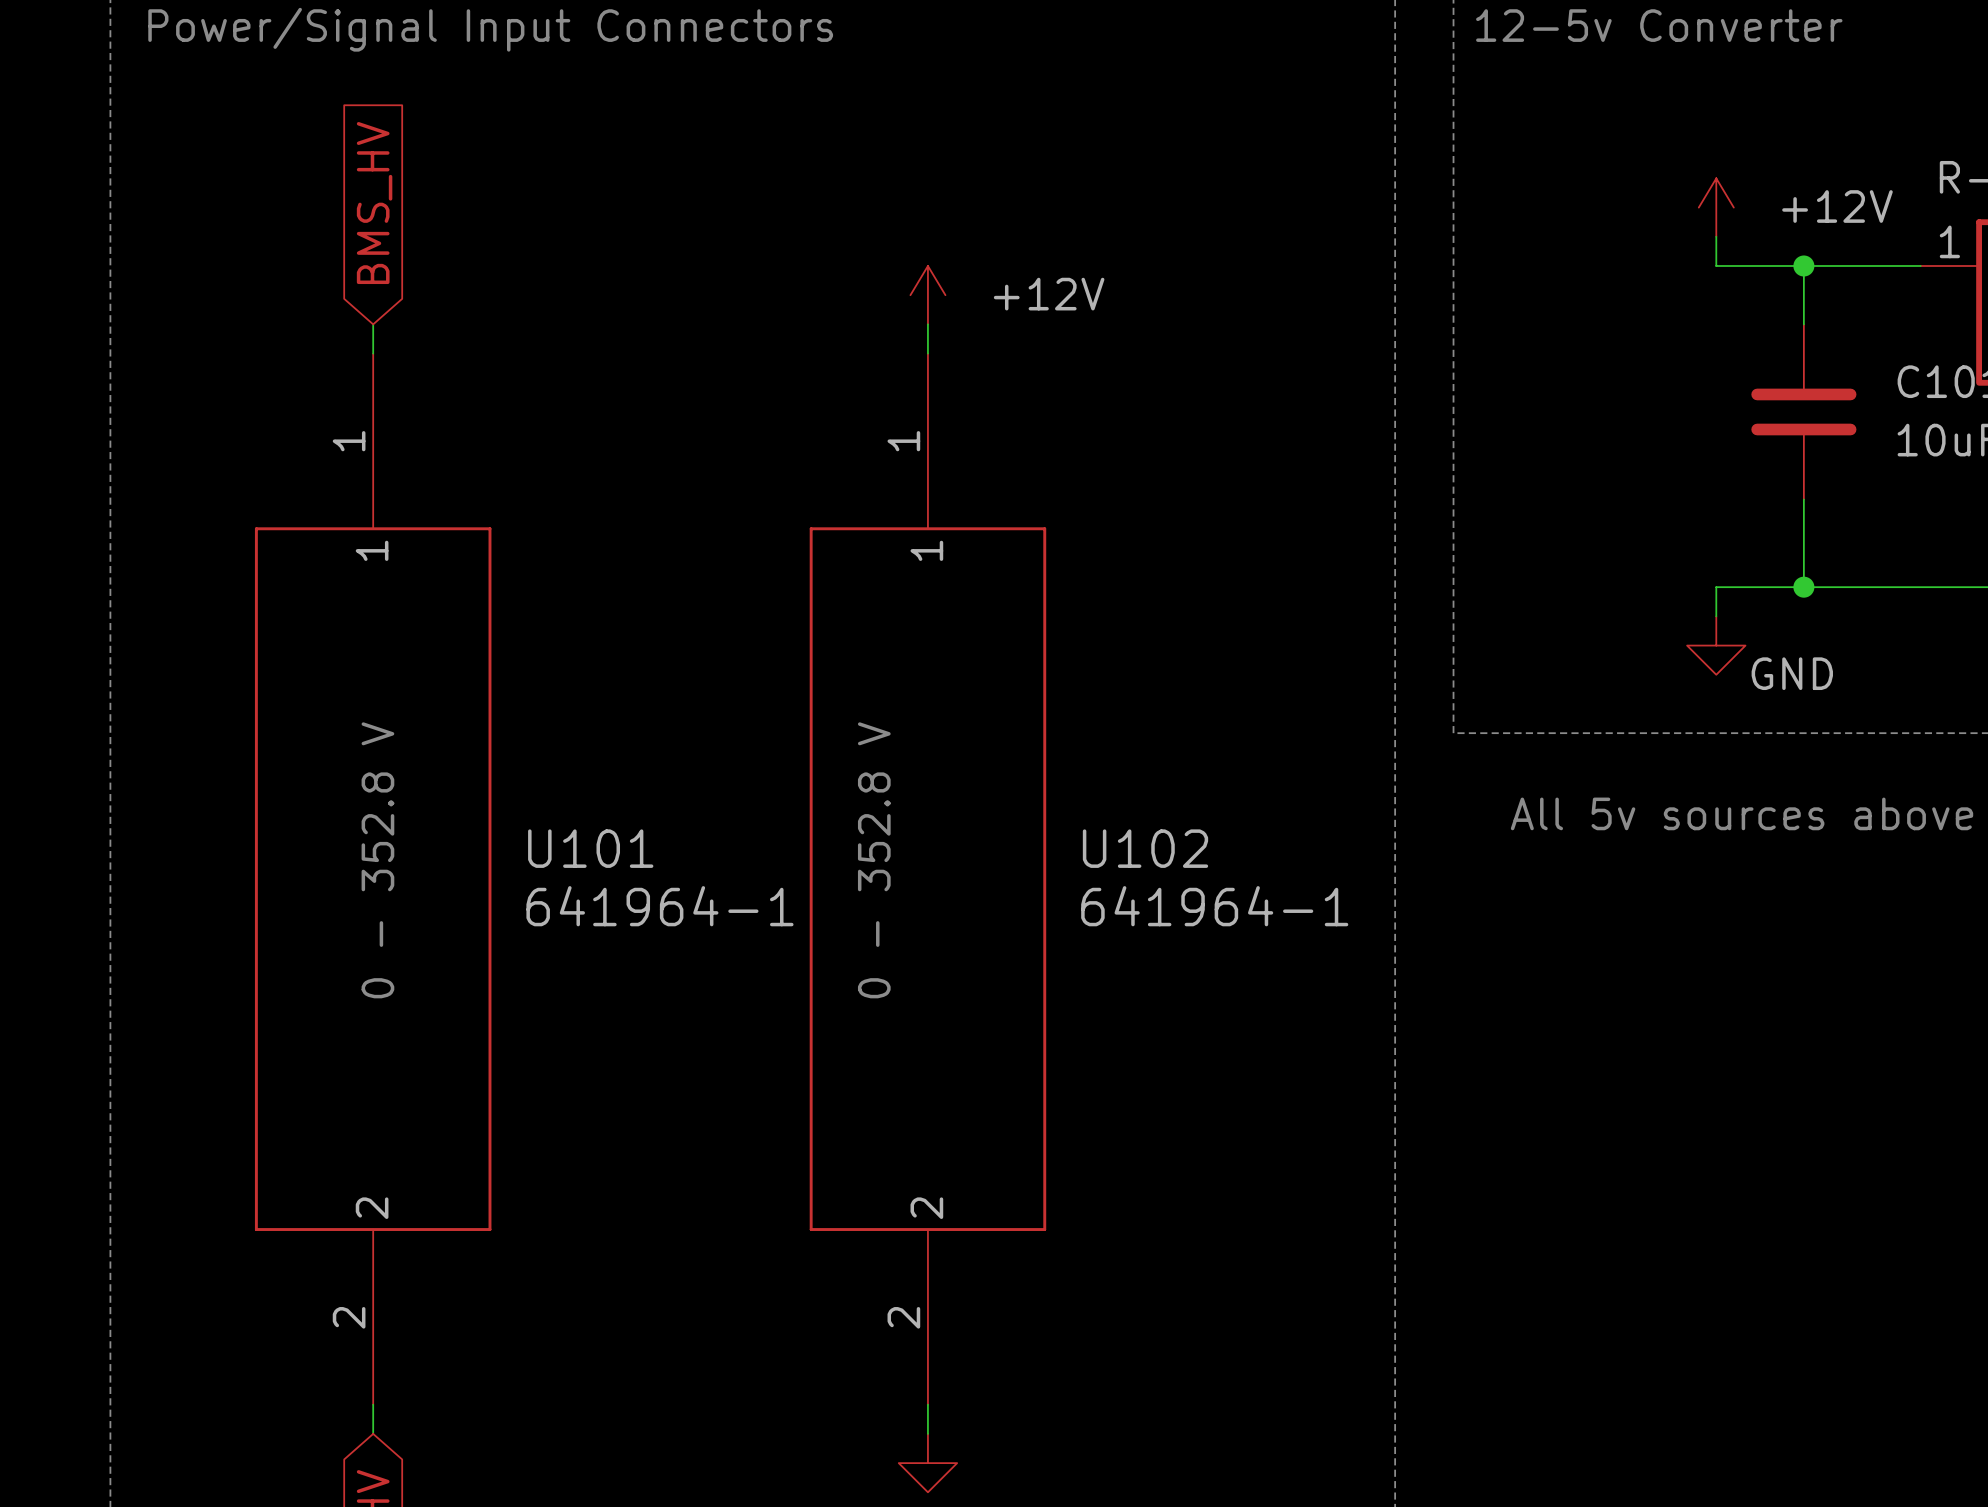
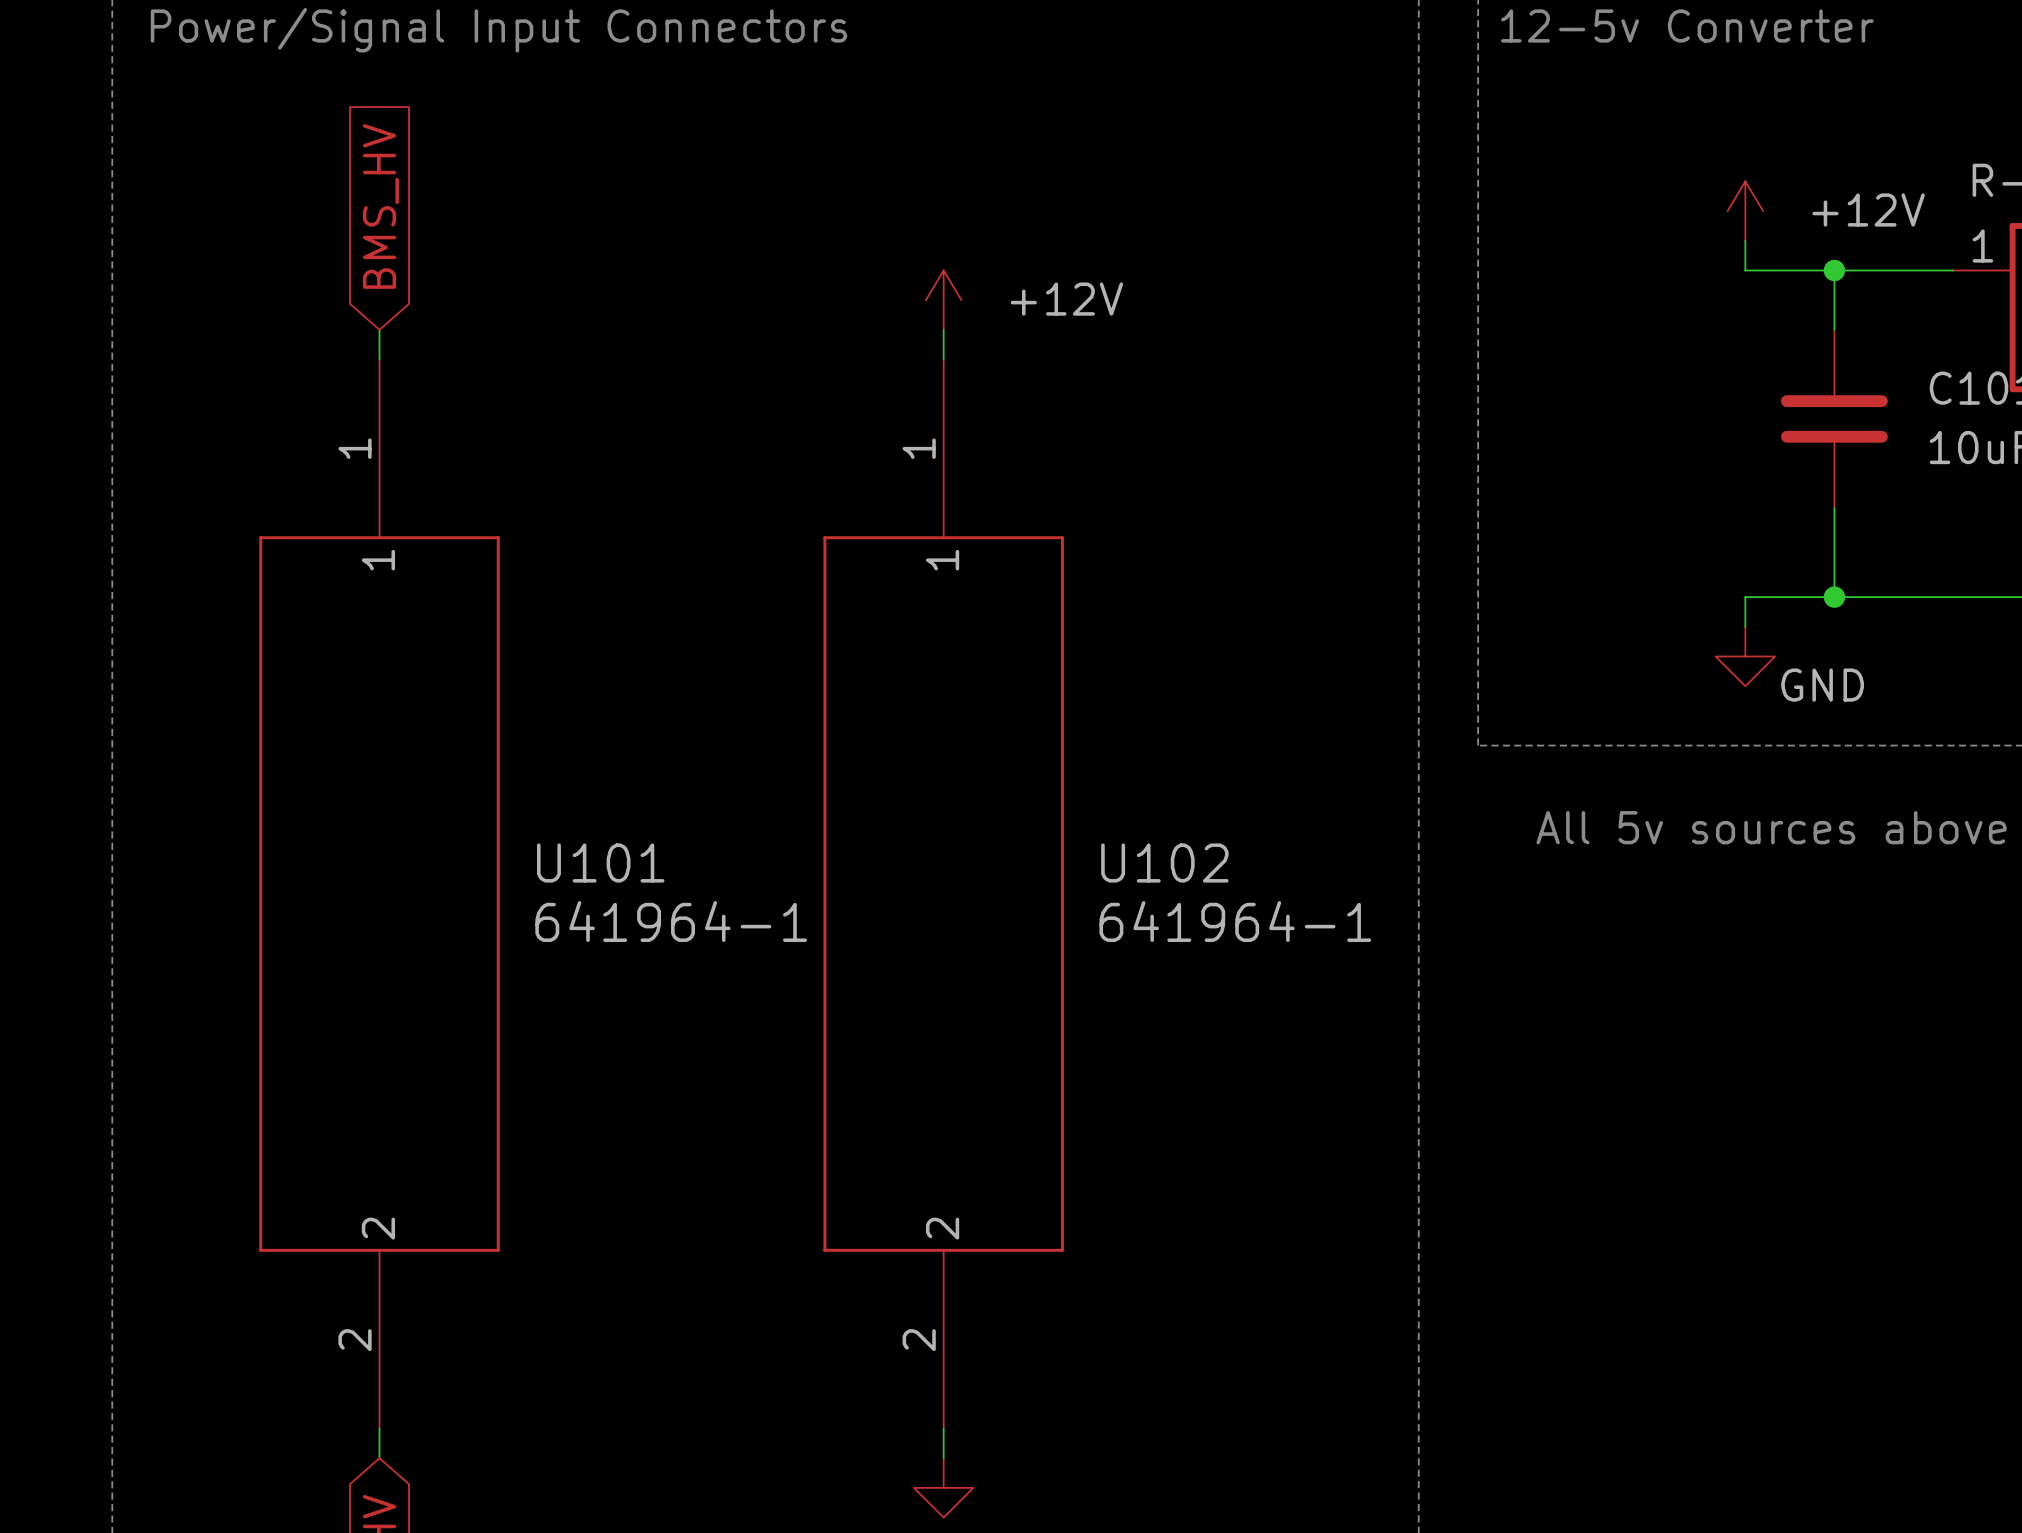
text: 0 - 352.8 V (377, 860) -> none
text: 0 - 352.8 V (874, 860) -> none

